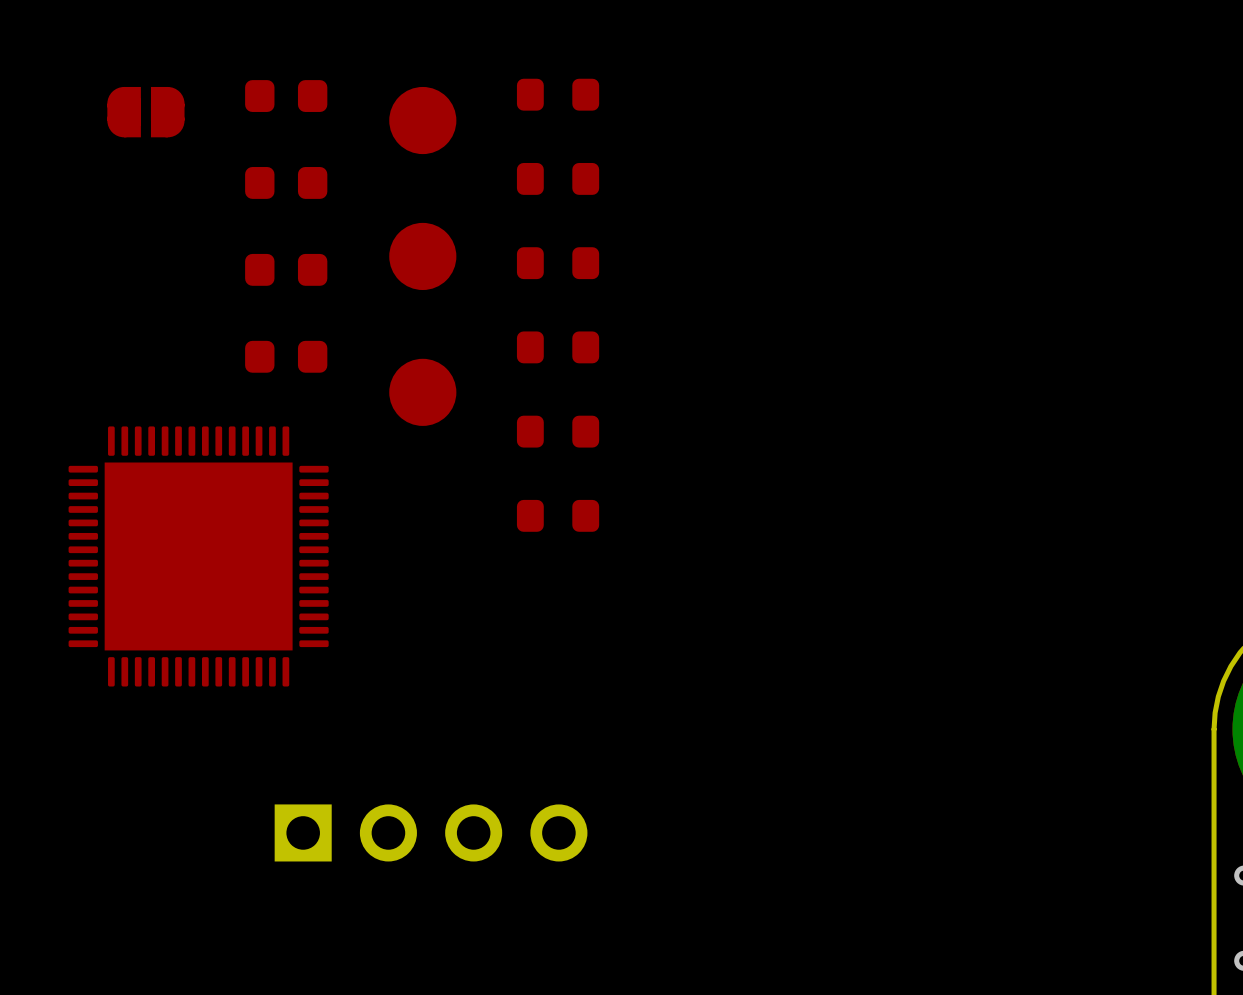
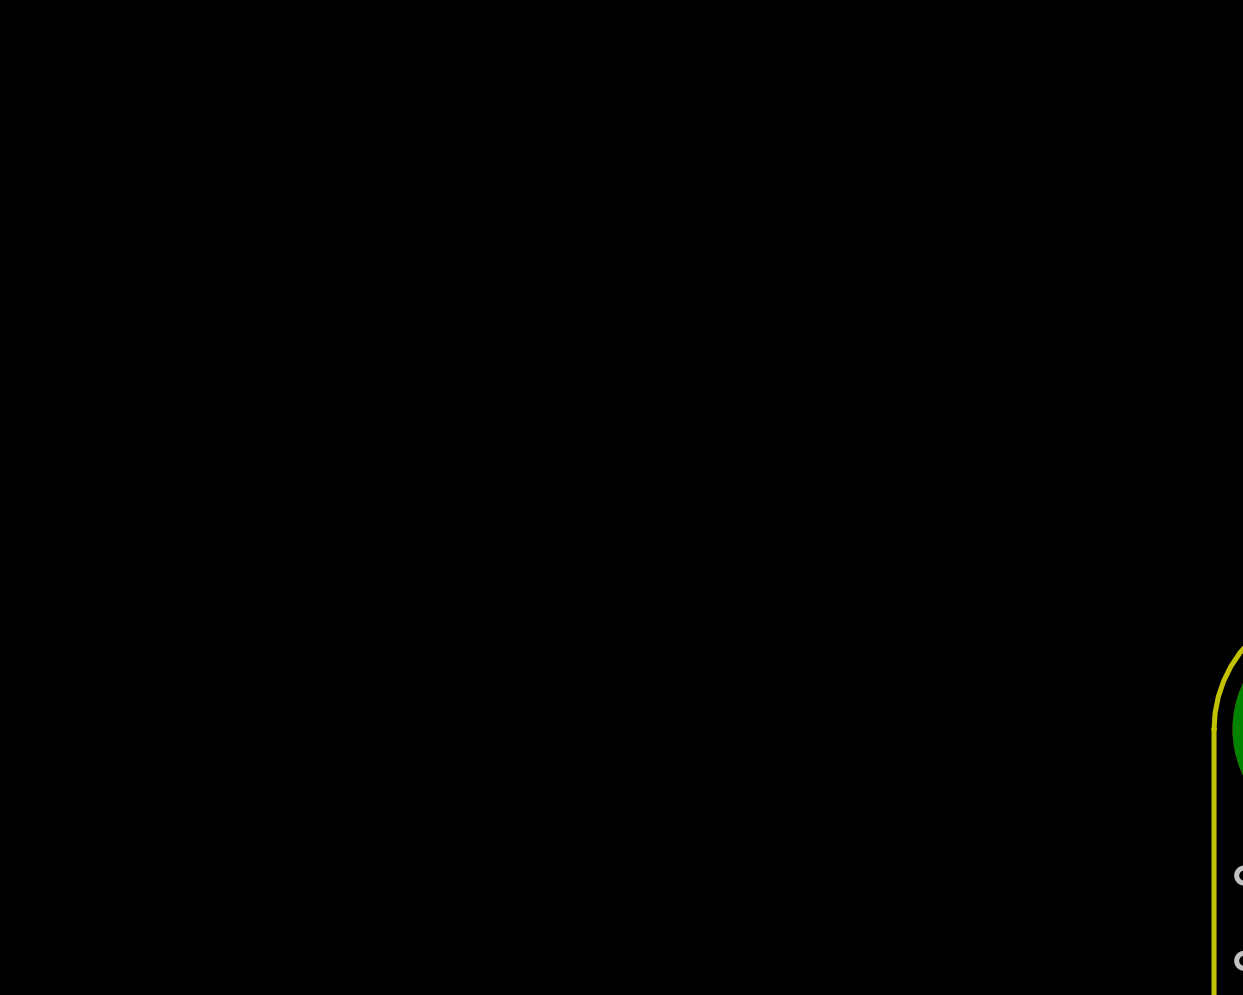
part: (558, 94) -> none
part: (286, 96) -> none
part: (145, 112) -> none
part: (422, 120) -> none
part: (558, 178) -> none
part: (286, 182) -> none
part: (422, 256) -> none
part: (558, 263) -> none
part: (286, 269) -> none
part: (558, 347) -> none
part: (286, 356) -> none
part: (422, 392) -> none
part: (558, 431) -> none
part: (558, 515) -> none
part: (198, 556) -> none
part: (431, 832) -> none

